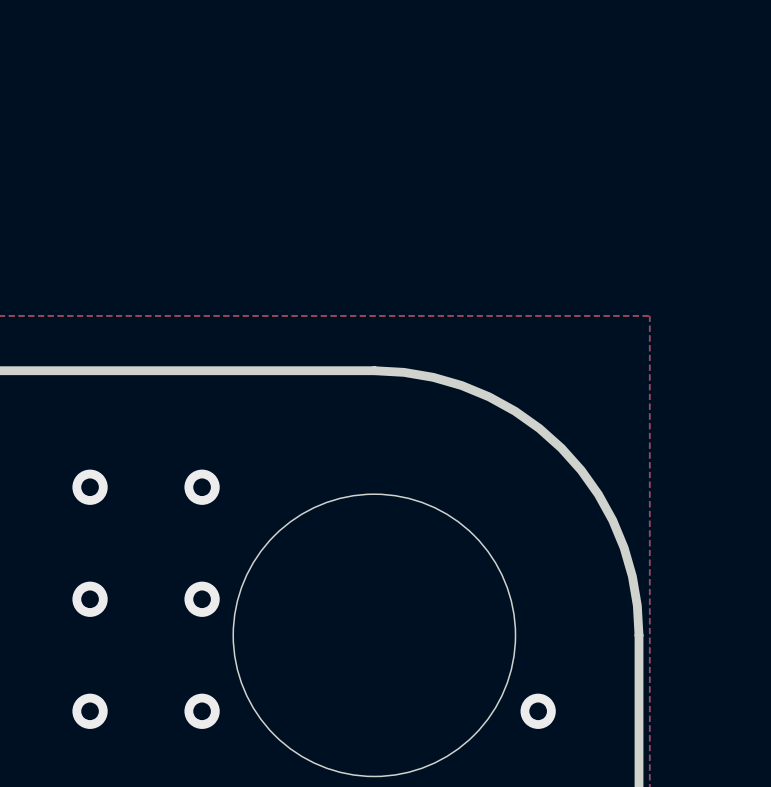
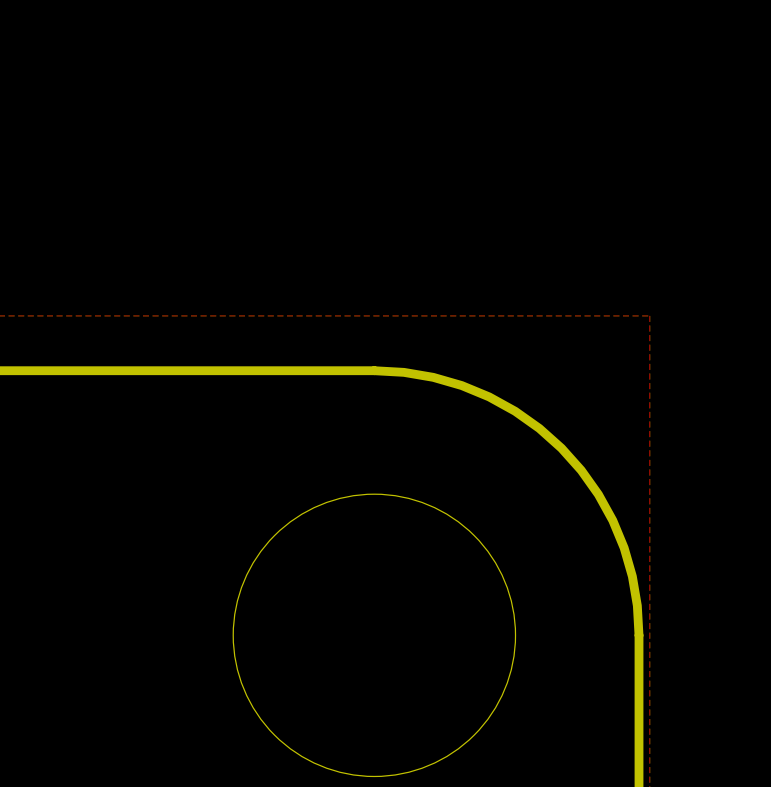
via: (90, 487) -> none
via: (202, 487) -> none
via: (90, 599) -> none
via: (202, 599) -> none
via: (90, 711) -> none
via: (202, 711) -> none
via: (538, 711) -> none

